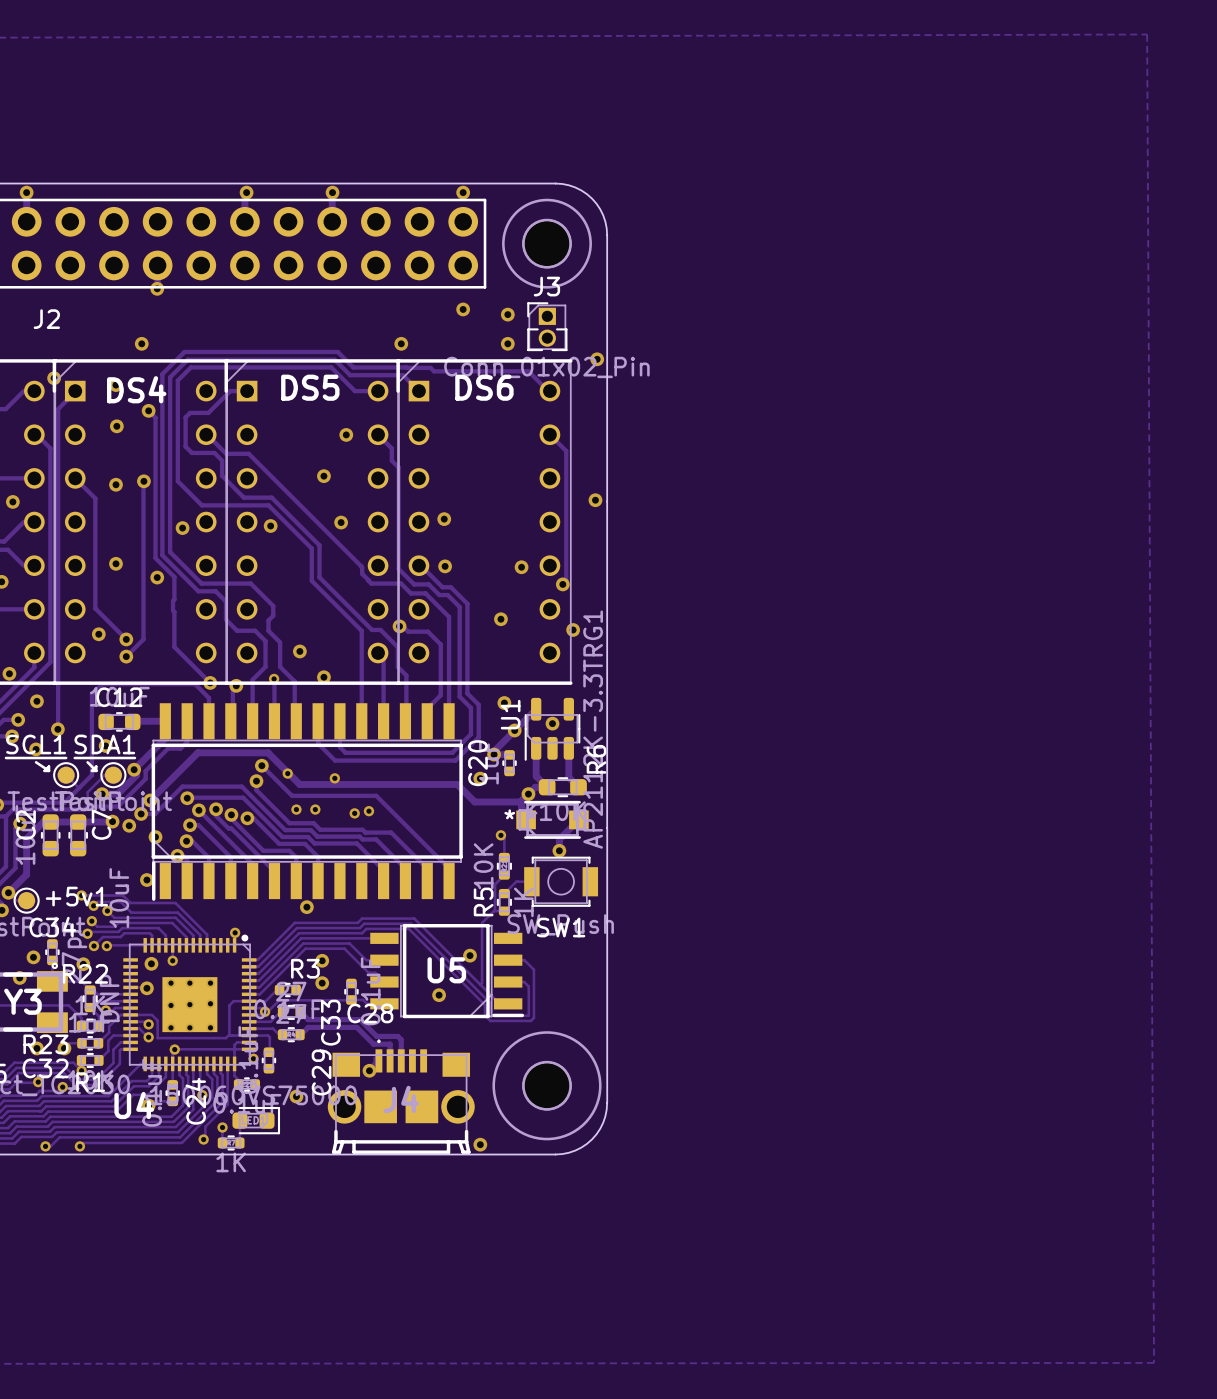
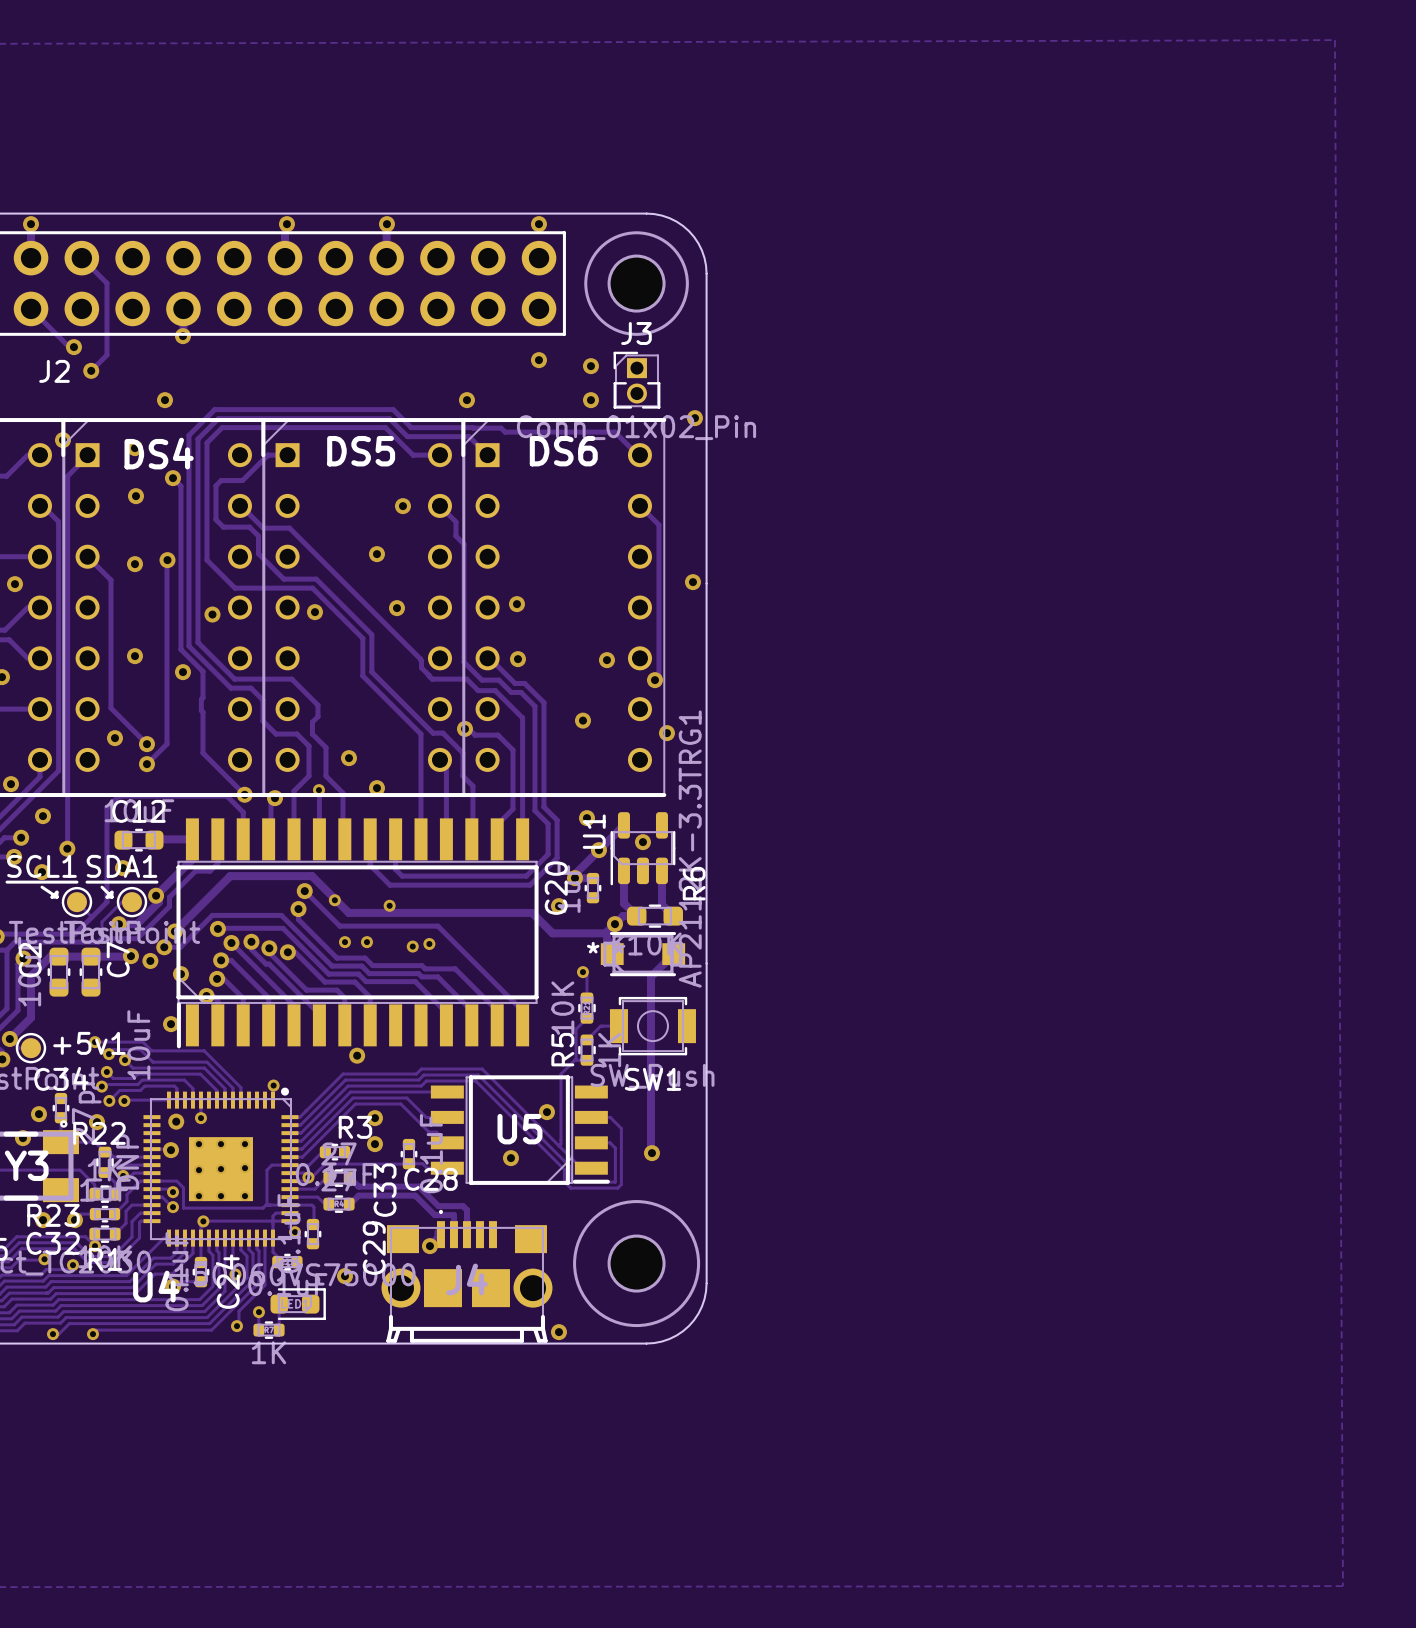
track: none -> (81, 258) (106, 283) (106, 355) (91, 370)
track: none -> (31, 308) (69, 347) (73, 347)
via: none -> (73, 347)
via: none -> (91, 370)
track: none -> (650, 990) (651, 1153)
via: (559, 850) -> none
via: none -> (651, 1153)

